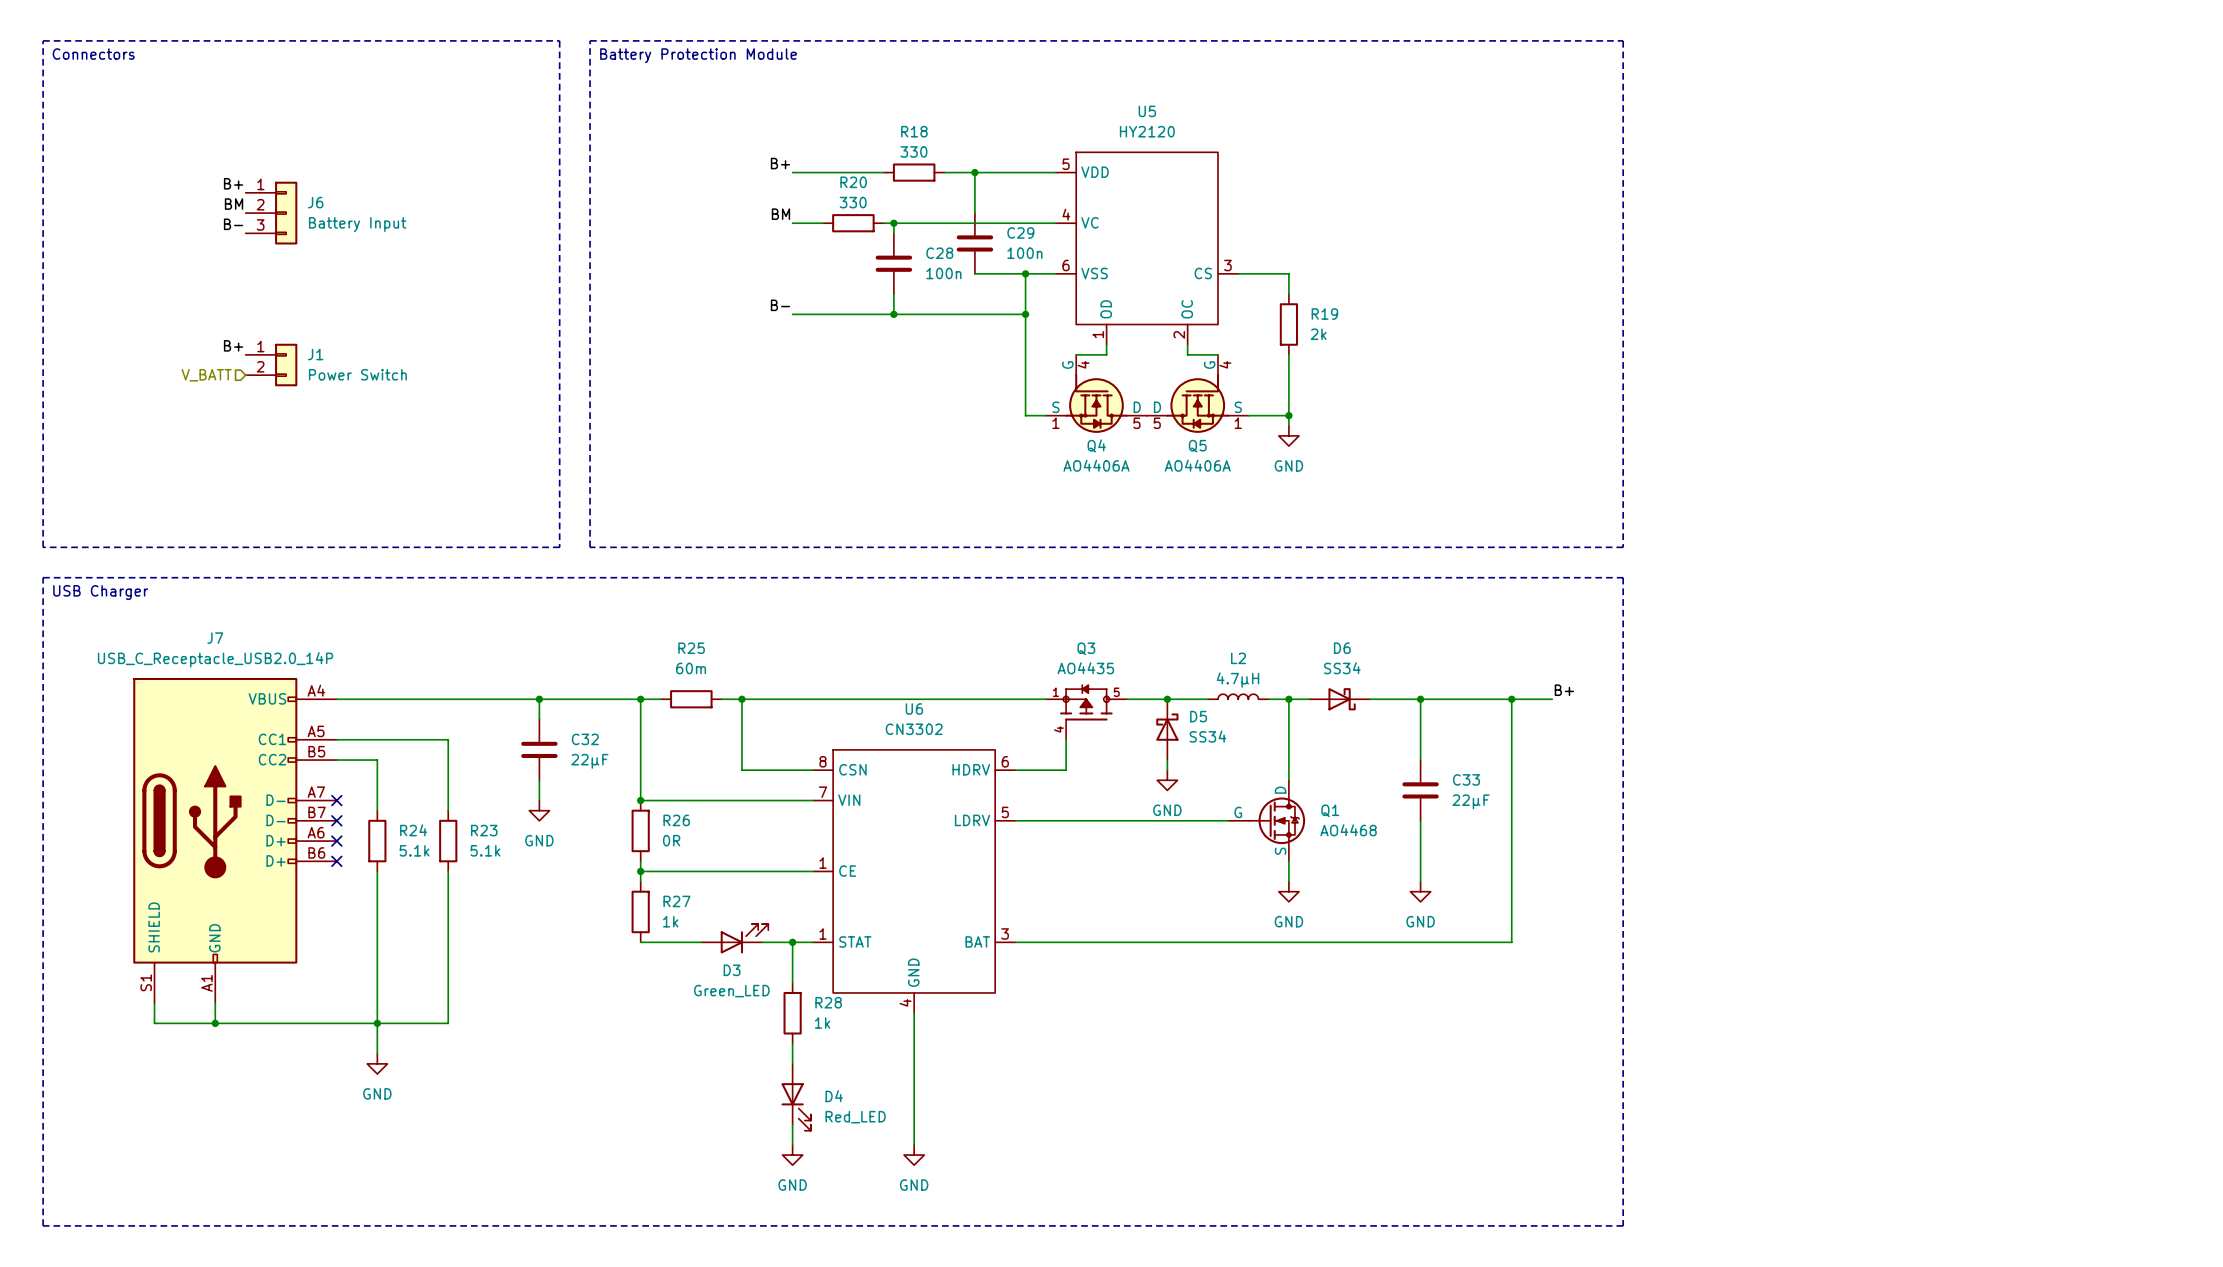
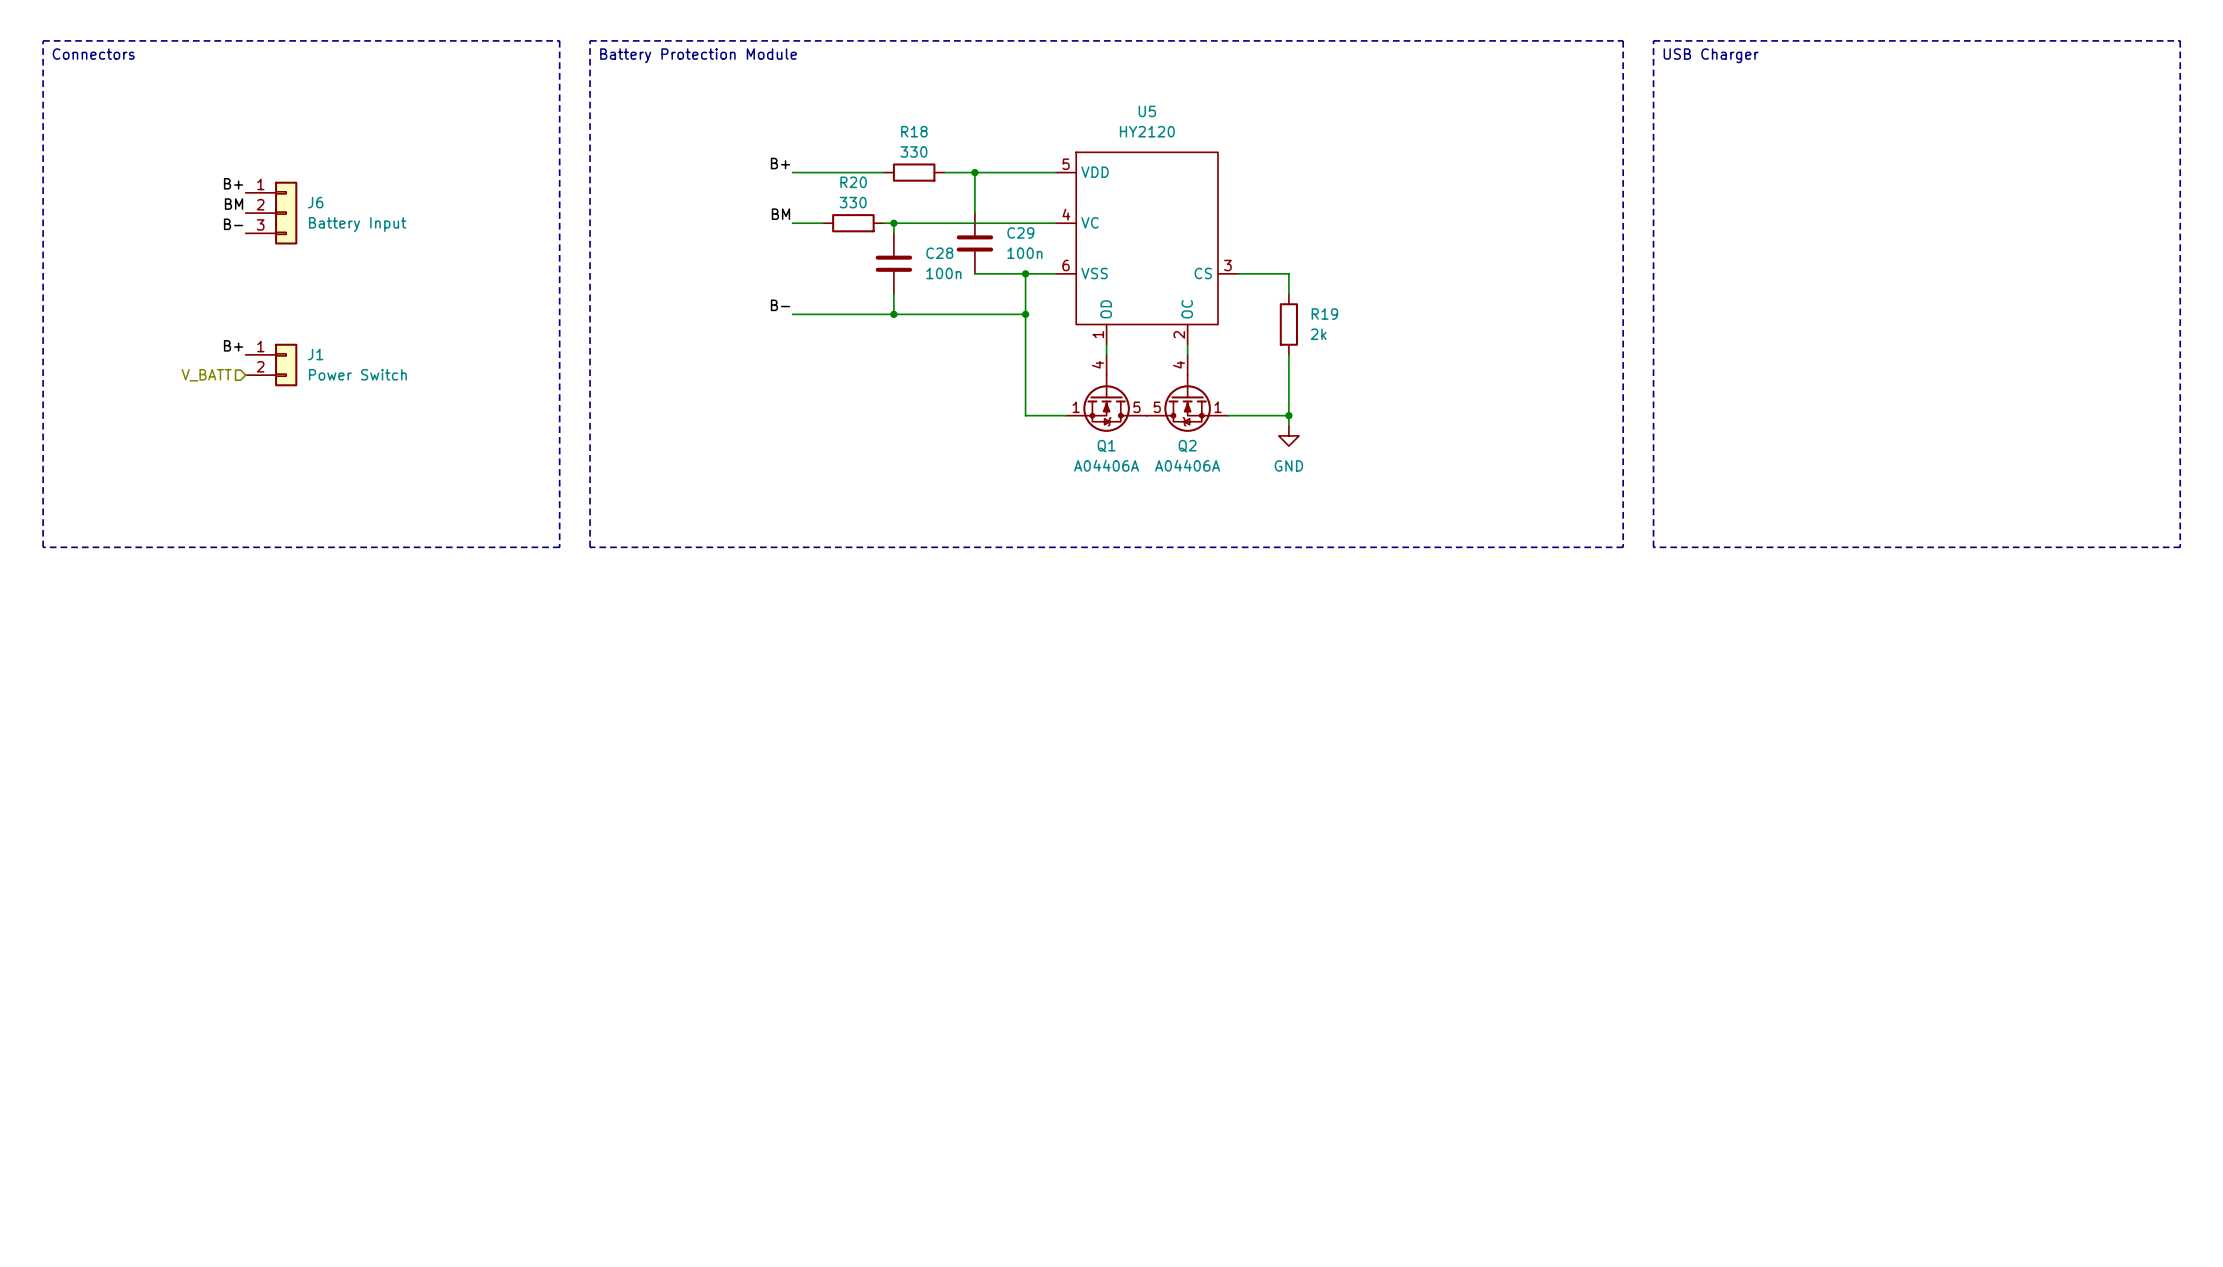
line: none -> (1653, 40) (2180, 40) (2180, 547) (1653, 547) (1653, 40)
text: none -> USB Charger (1711, 55)
wire: (1076, 354) (1106, 354) -> none
wire: (1187, 354) (1218, 354) -> none
Q4: (1096, 393) -> none
Q2: none -> A04406A (1187, 393)
Q5: (1197, 393) -> none
line: (43, 577) (1623, 577) (1623, 1225) (43, 1225) (43, 577) -> none
text: USB Charger (100, 592) -> none
label: B+ (1564, 690) -> none
L2: 4.7µH (1238, 696) -> none
wire: (336, 699) (660, 699) -> none
wire: (539, 699) (539, 719) -> none
junction: (539, 699) -> none
wire: (640, 699) (640, 800) (812, 800) -> none
junction: (640, 699) -> none
R25: 60m (691, 699) -> none
wire: (721, 699) (1045, 699) -> none
wire: (741, 699) (741, 770) (812, 770) -> none
junction: (741, 699) -> none
wire: (1126, 699) (1207, 699) -> none
junction: (1167, 699) -> none
wire: (1268, 699) (1309, 699) -> none
wire: (1288, 699) (1288, 780) -> none
junction: (1288, 699) -> none
D6: SS34 (1339, 699) -> none
wire: (1369, 699) (1552, 699) -> none
wire: (1420, 699) (1420, 760) -> none
junction: (1420, 699) -> none
wire: (1511, 699) (1511, 942) (1015, 942) -> none
junction: (1511, 699) -> none
Q3: AO4435 (1086, 712) -> none
D5: SS34 (1167, 729) -> none
wire: (336, 739) (448, 739) (448, 810) -> none
wire: (1066, 739) (1066, 770) (1015, 770) -> none
C32: 22µF (539, 749) -> none
wire: (336, 760) (377, 760) (377, 810) -> none
wire: (1167, 760) (1167, 770) -> none
wire: (539, 780) (539, 800) -> none
power symbol: GND (1167, 780) -> none
Q1 symbol: [1228, 780, 1306, 862] -> [1066, 354, 1148, 432]
C33: 22µF (1420, 790) -> none
no-connect mark: (336, 800) -> none
junction: (640, 800) -> none
power symbol: GND (539, 810) -> none
Q1 name position: Q1 (1330, 810) -> Q1 (1106, 446)
no-connect mark: (336, 820) -> none
wire: (1015, 820) (1228, 820) -> none
wire: (1420, 820) (1420, 881) -> none
R26: 0R (640, 830) -> none
Q1 value: AO4468 (1348, 830) -> A04406A (1106, 465)
J7: USB_C_Receptacle_USB2.0_14P (235, 840) -> none
no-connect mark: (336, 841) -> none
R24: 5.1k (377, 841) -> none
R23: 5.1k (448, 841) -> none
no-connect mark: (336, 861) -> none
wire: (640, 861) (640, 881) -> none
wire: (1288, 861) (1288, 881) -> none
wire: (377, 871) (377, 1053) -> none
wire: (448, 871) (448, 1023) (154, 1023) (154, 1003) -> none
wire: (640, 871) (812, 871) -> none
junction: (640, 871) -> none
U6: CN3302 (914, 881) -> none
power symbol: GND (1288, 891) -> none
power symbol: GND (1420, 891) -> none
R27: 1k (640, 911) -> none
D3: Green_LED (734, 938) -> none
wire: (640, 942) (701, 942) -> none
wire: (762, 942) (812, 942) -> none
wire: (792, 942) (792, 982) -> none
junction: (792, 942) -> none
wire: (215, 1003) (215, 1023) -> none
R28: 1k (792, 1013) -> none
wire: (914, 1013) (914, 1144) -> none
junction: (215, 1023) -> none
junction: (377, 1023) -> none
wire: (792, 1043) (792, 1063) -> none
power symbol: GND (377, 1063) -> none
D4: Red_LED (796, 1097) -> none
wire: (792, 1124) (792, 1144) -> none
power symbol: GND (792, 1155) -> none
power symbol: GND (914, 1155) -> none

